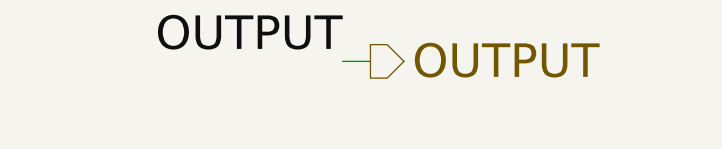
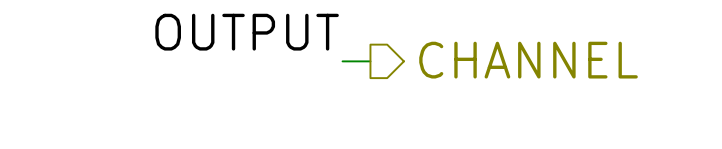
hierarchical label: OUTPUT (507, 60) -> CHANNEL (528, 60)

